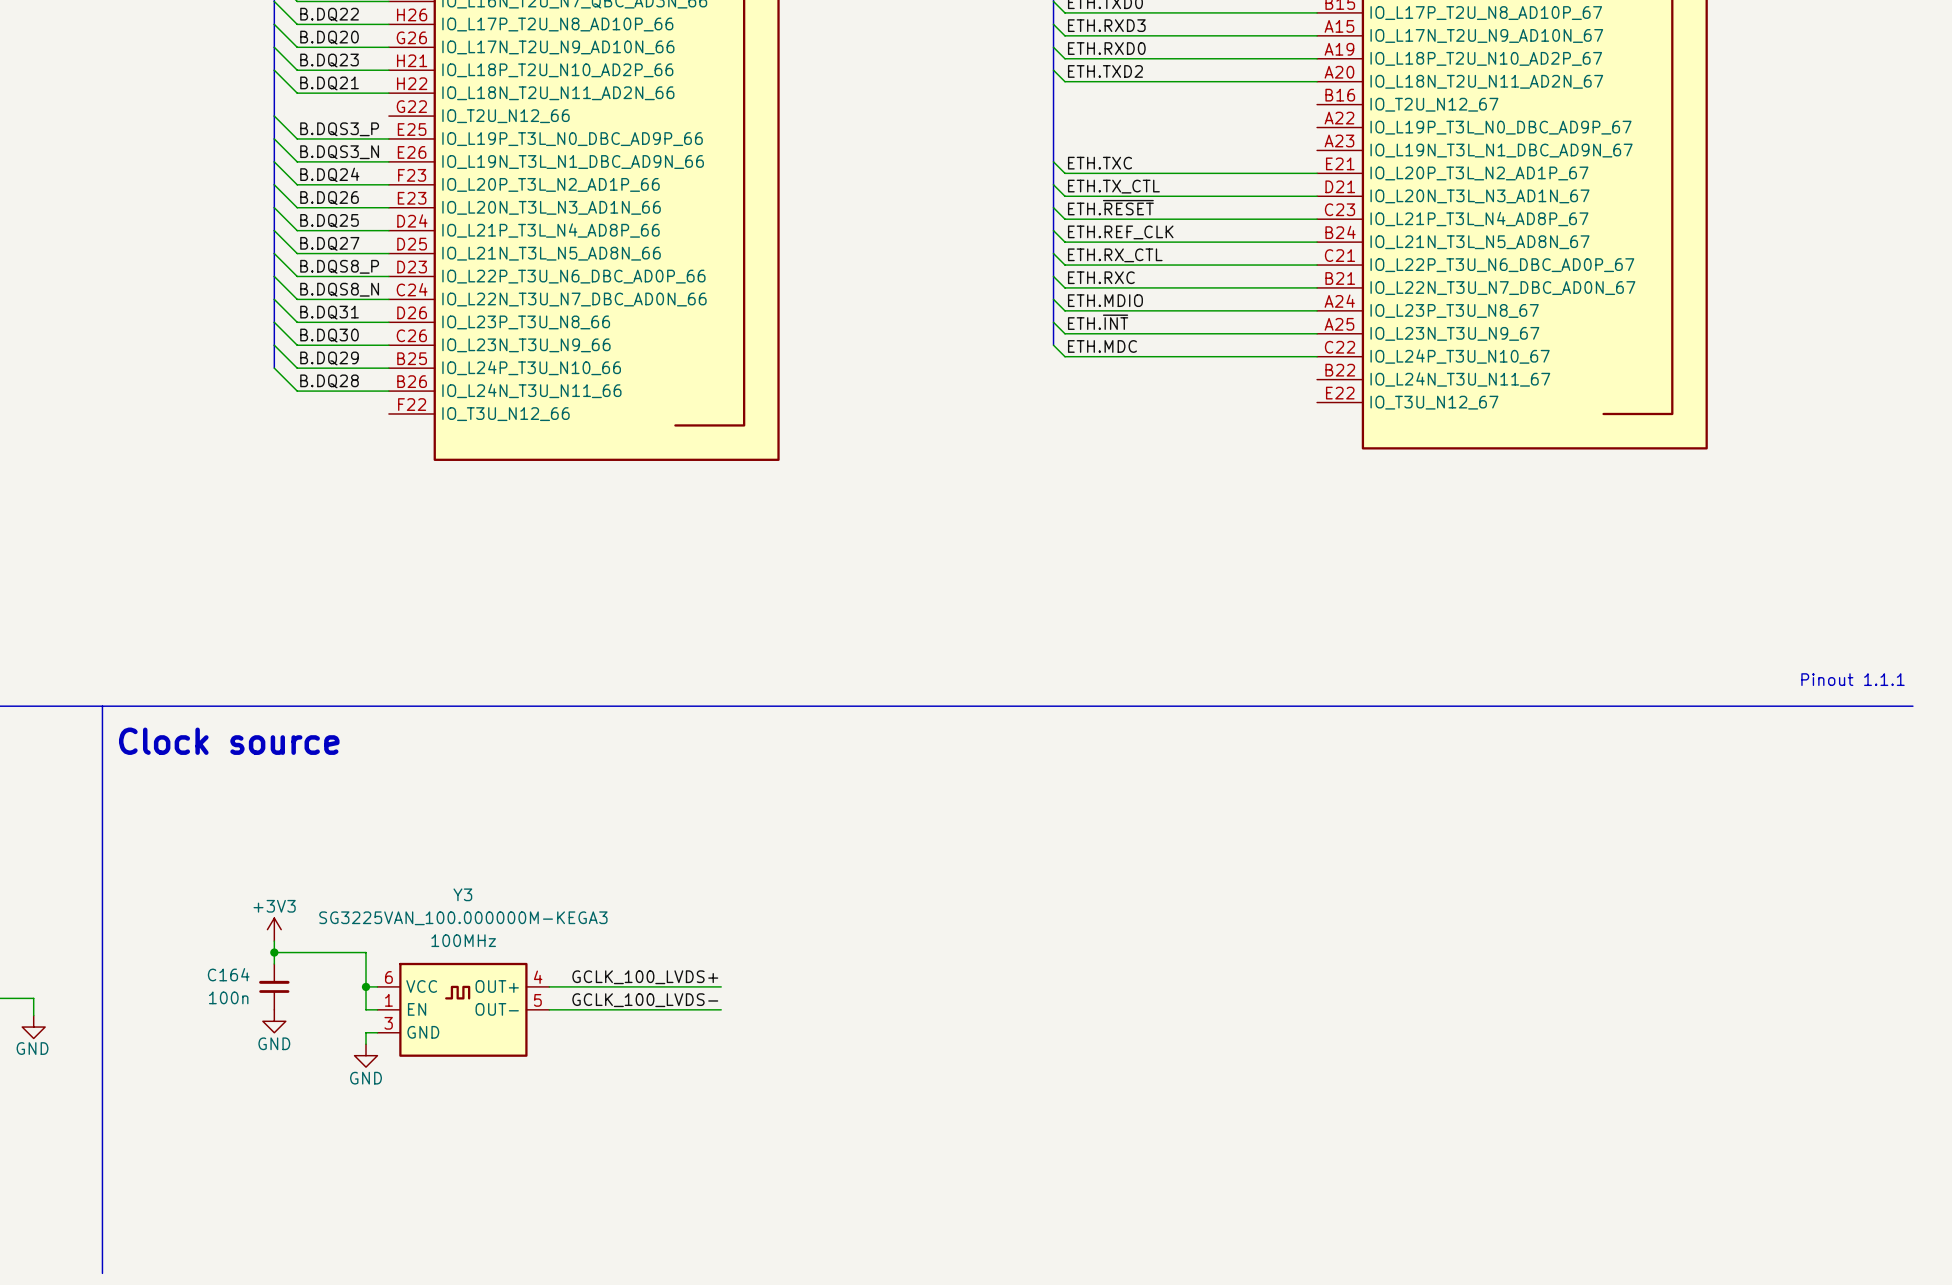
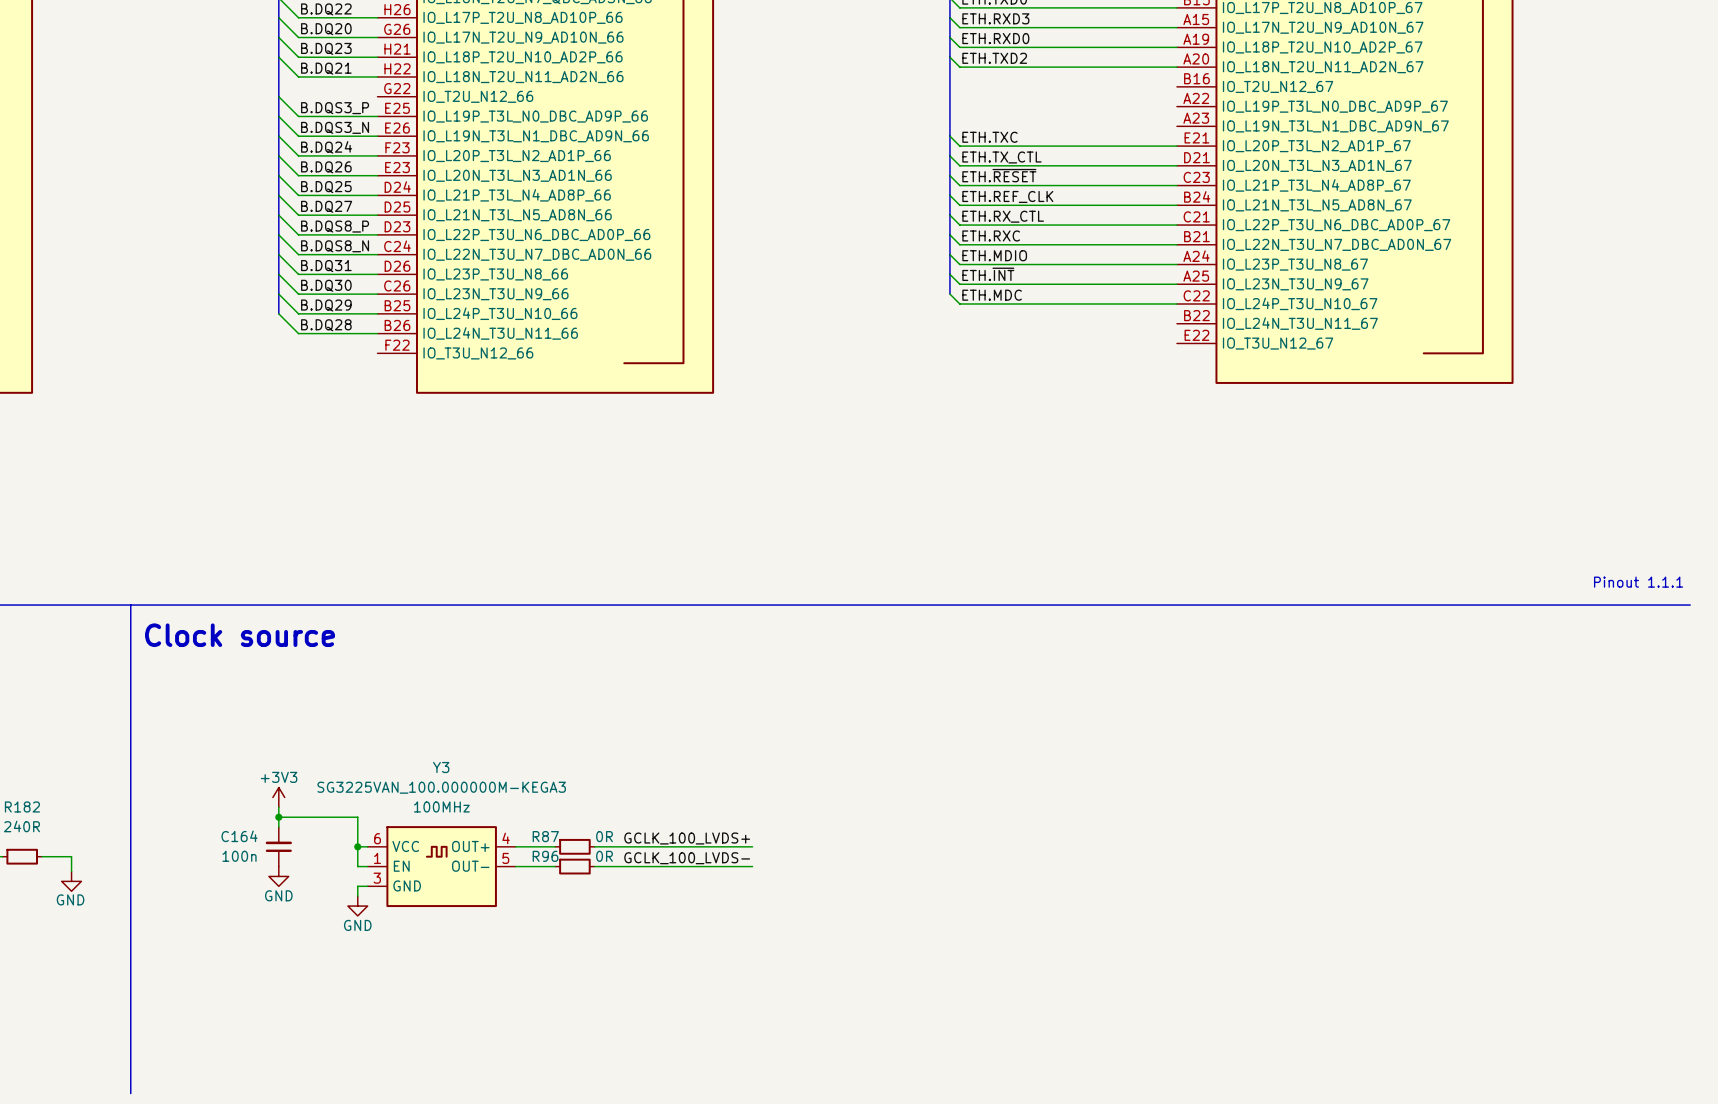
label position: GCLK_100_LVDS+ (645, 977) -> GCLK_100_LVDS+ (687, 838)
wire: (595, 986) (641, 986) -> none
R87: none -> (574, 846)
wire: none -> (663, 846) (752, 846)
label position: GCLK_100_LVDS- (645, 1000) -> GCLK_100_LVDS- (687, 858)
wire: (595, 1009) (641, 1009) -> none
R96: none -> (574, 866)
wire: none -> (663, 866) (752, 866)

